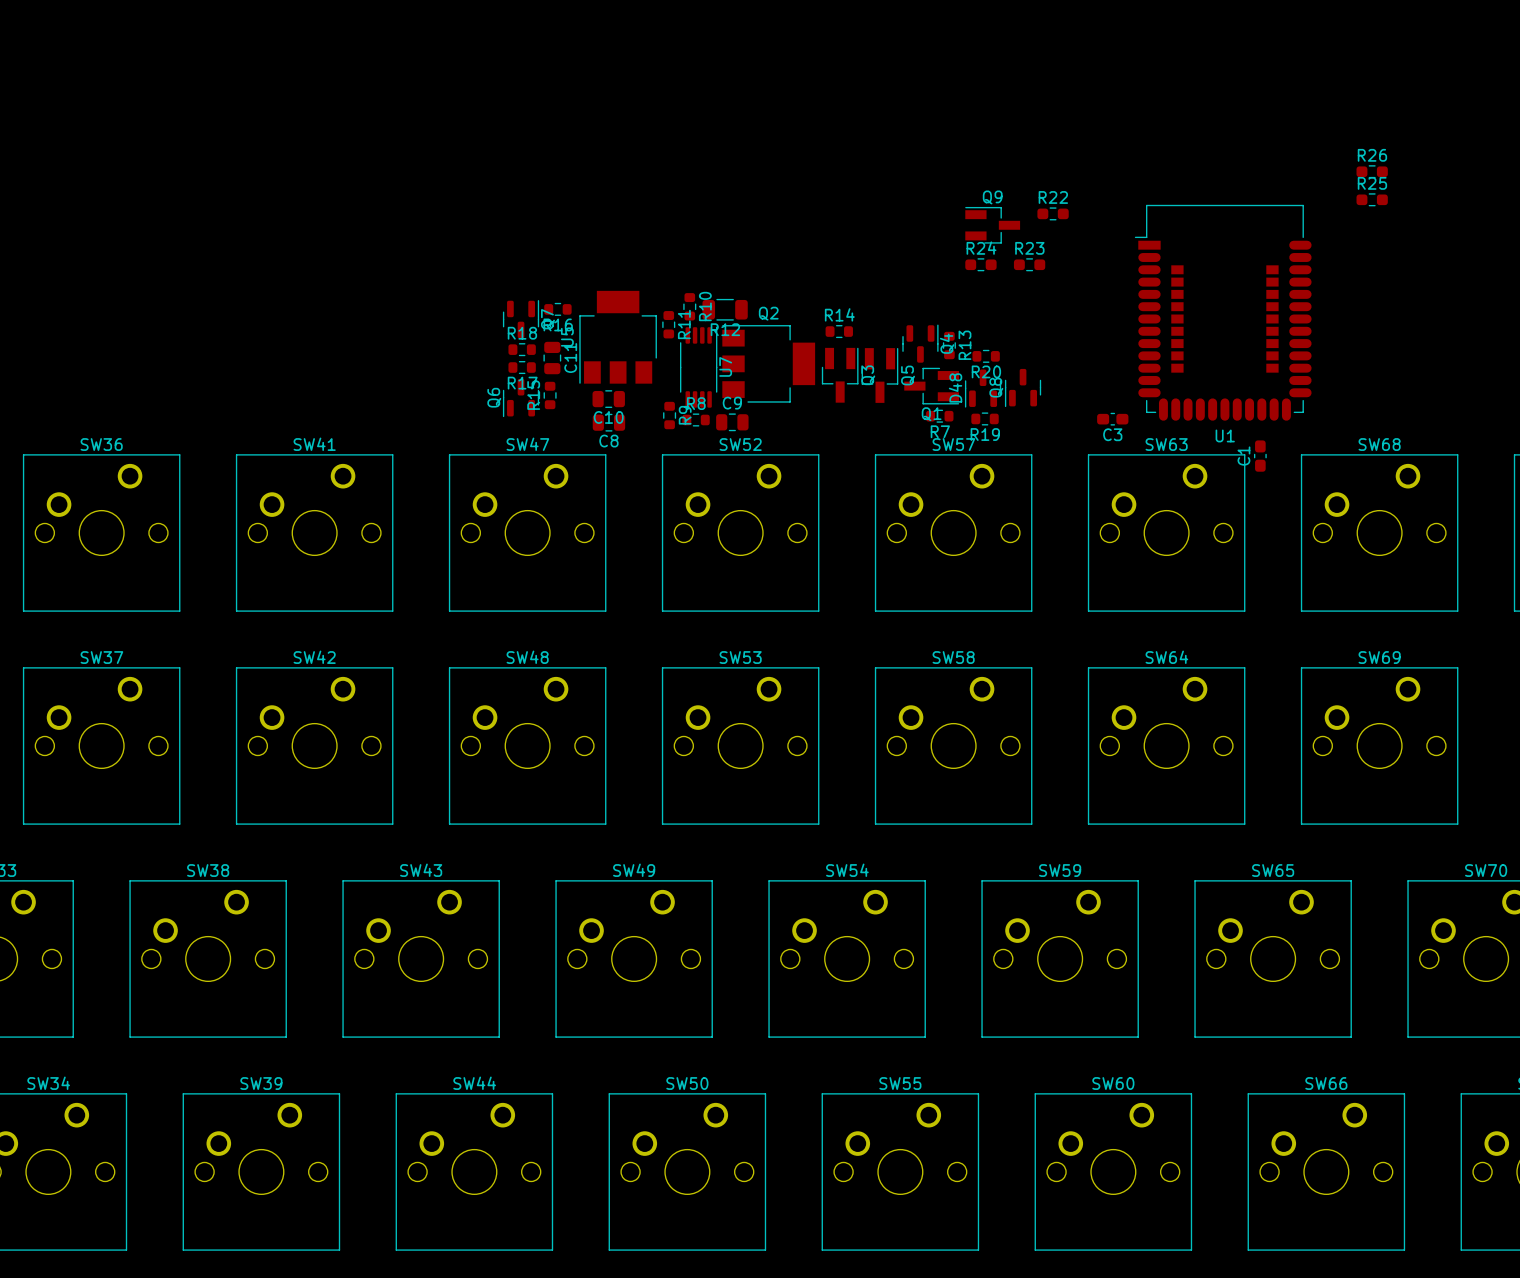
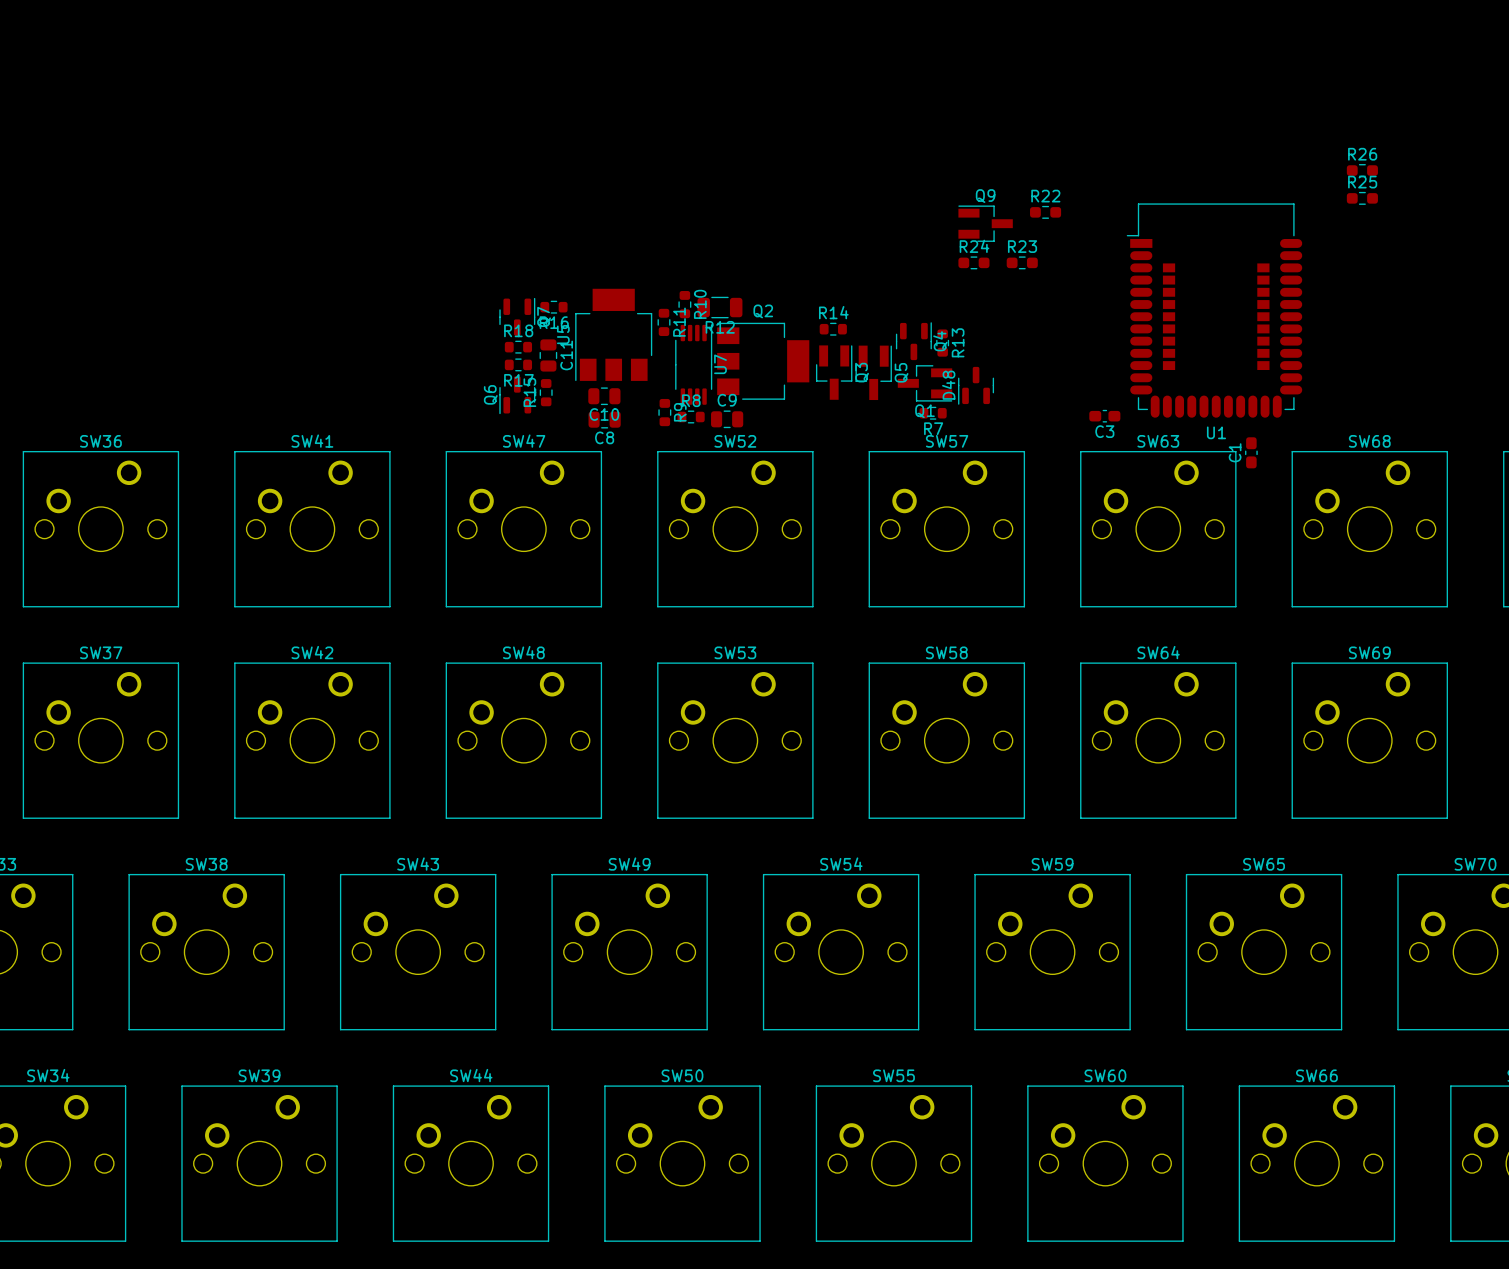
R20: (986, 356) -> none
Q8: (1023, 387) -> none
R19: (985, 418) -> none

